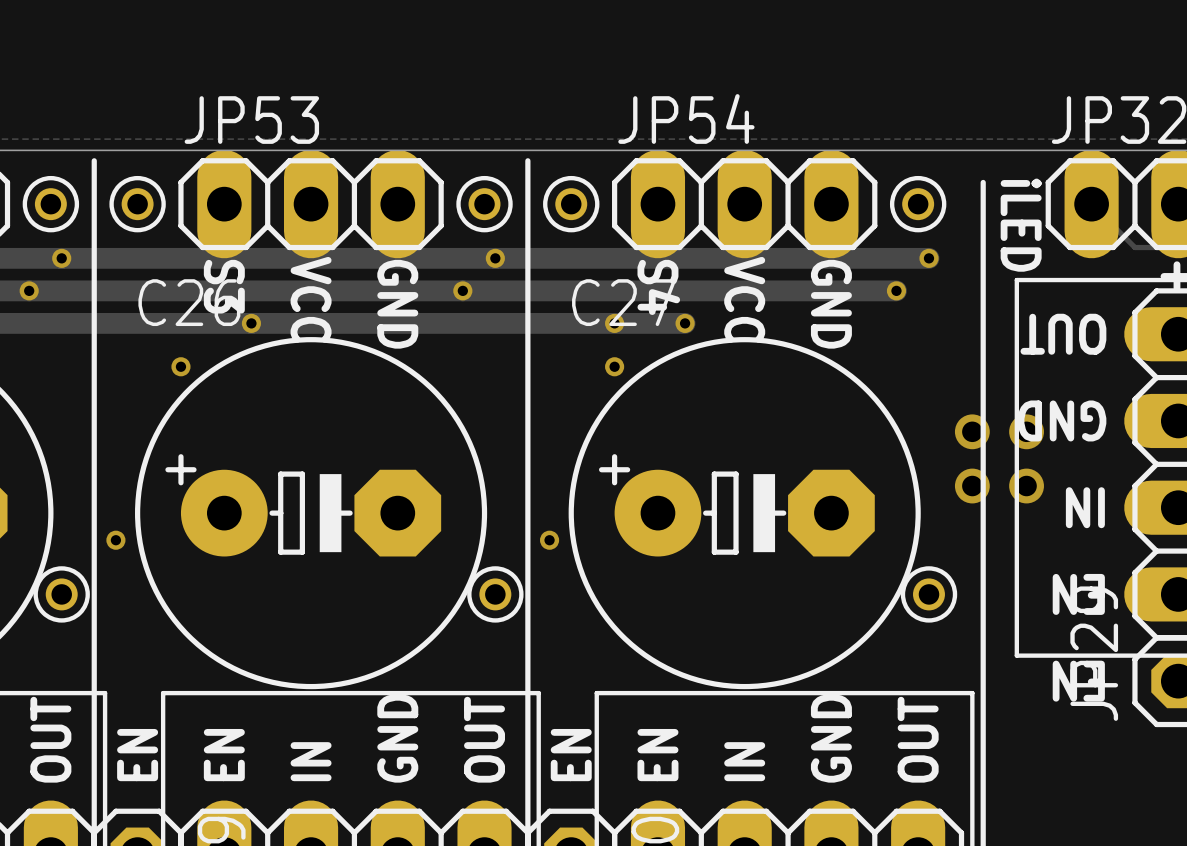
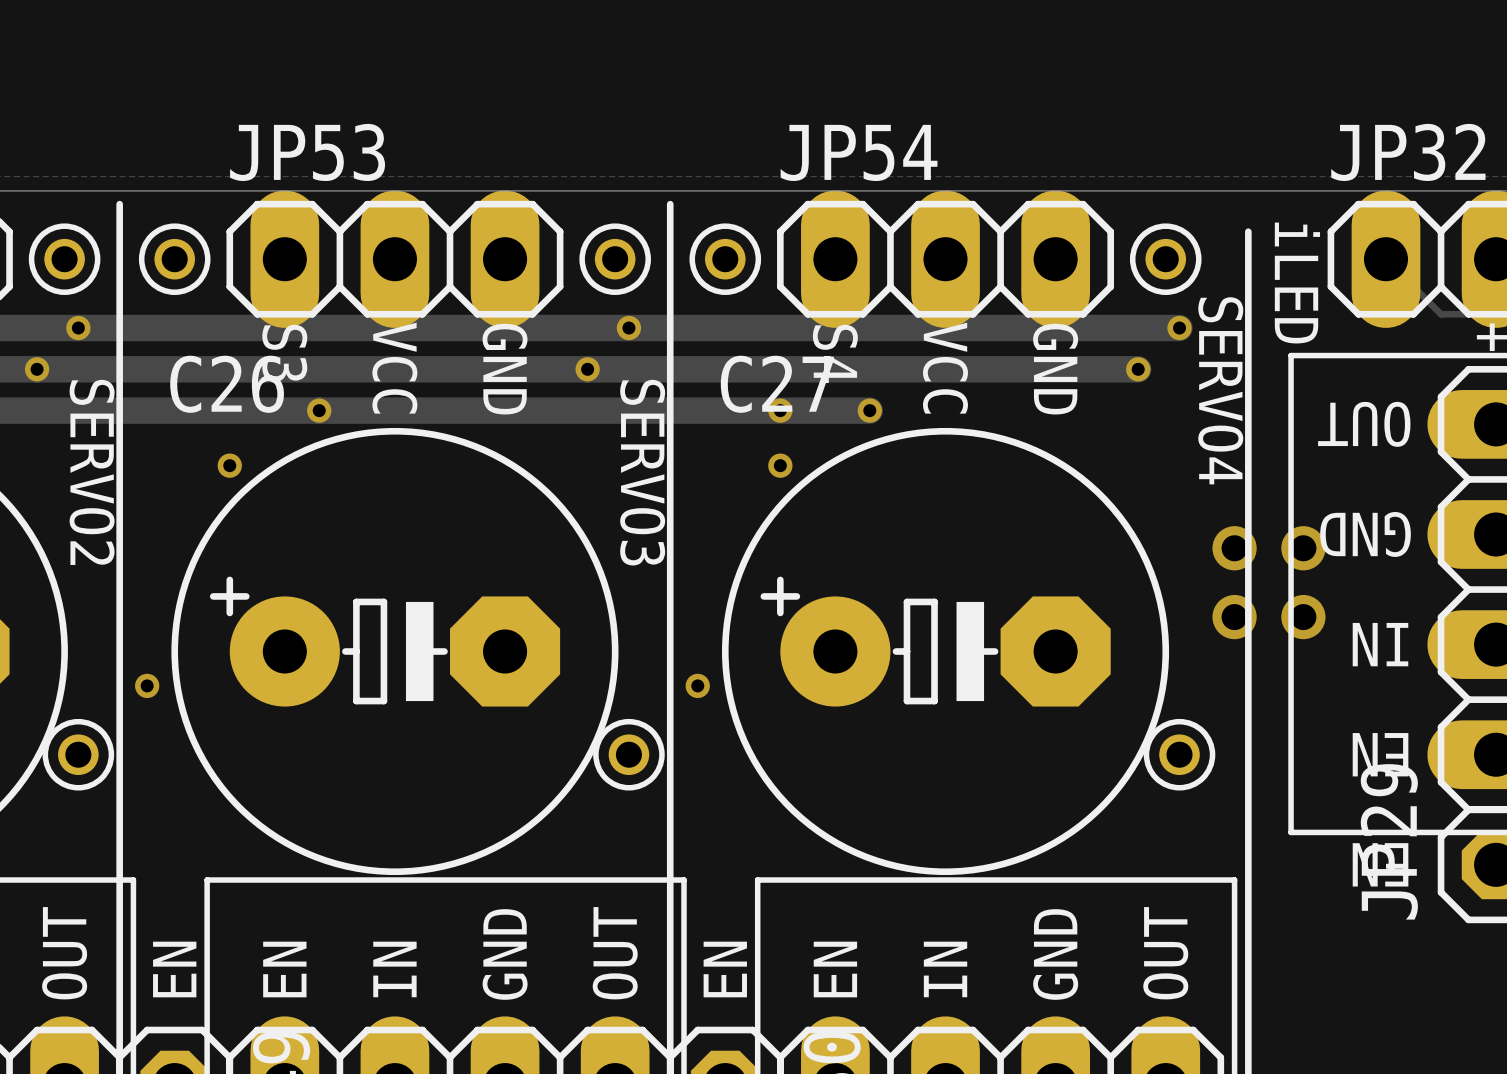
text: none -> SERVO4 (1220, 390)
text: none -> SERVO2 (92, 472)
text: none -> SERVO3 (642, 472)

